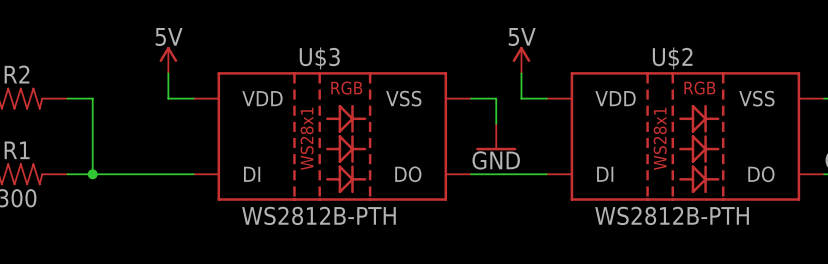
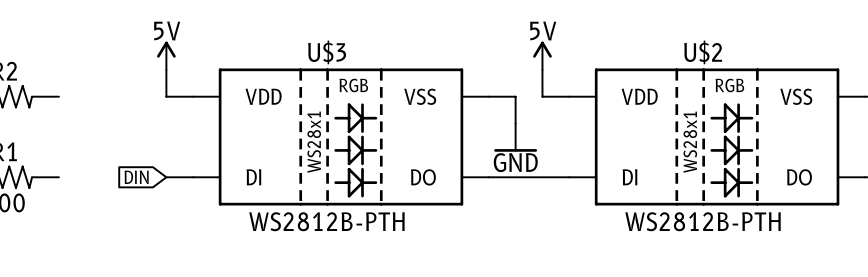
wire: (67, 98) (92, 98) (92, 174) -> none
wire: (67, 174) (168, 174) -> none
junction: (92, 174) -> none
global label: none -> DIN (136, 177)

